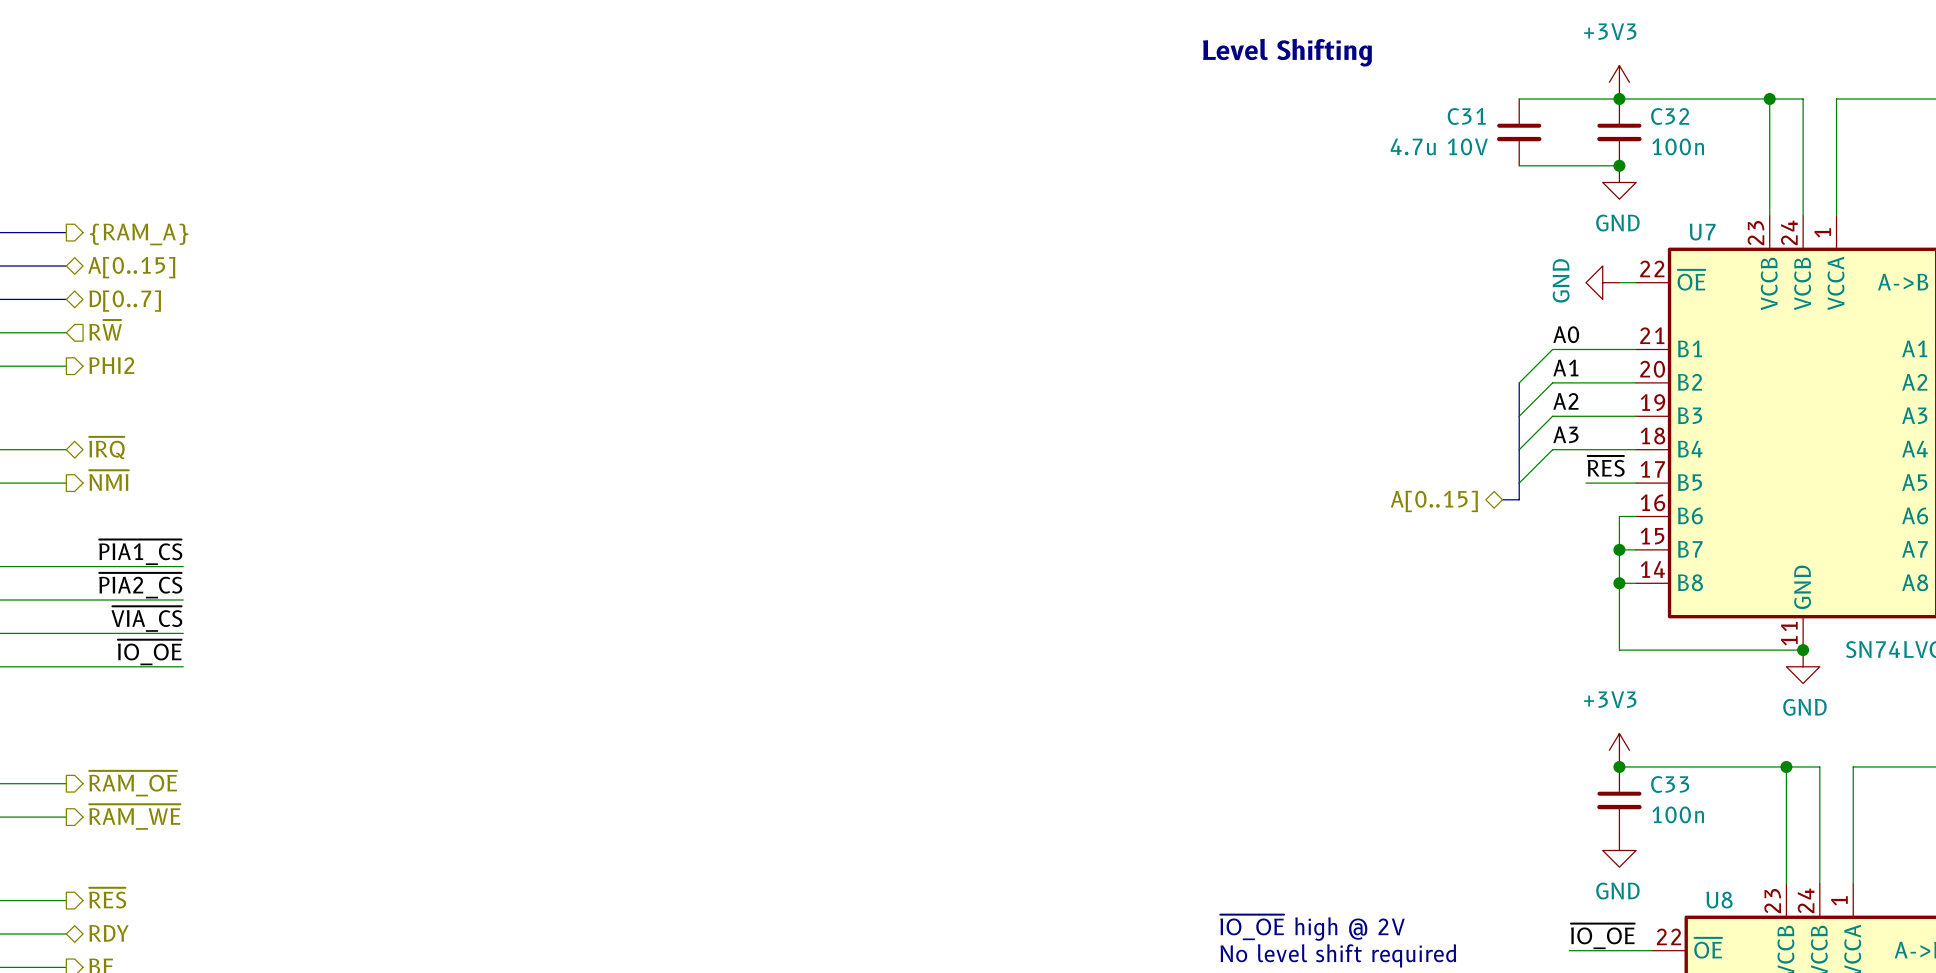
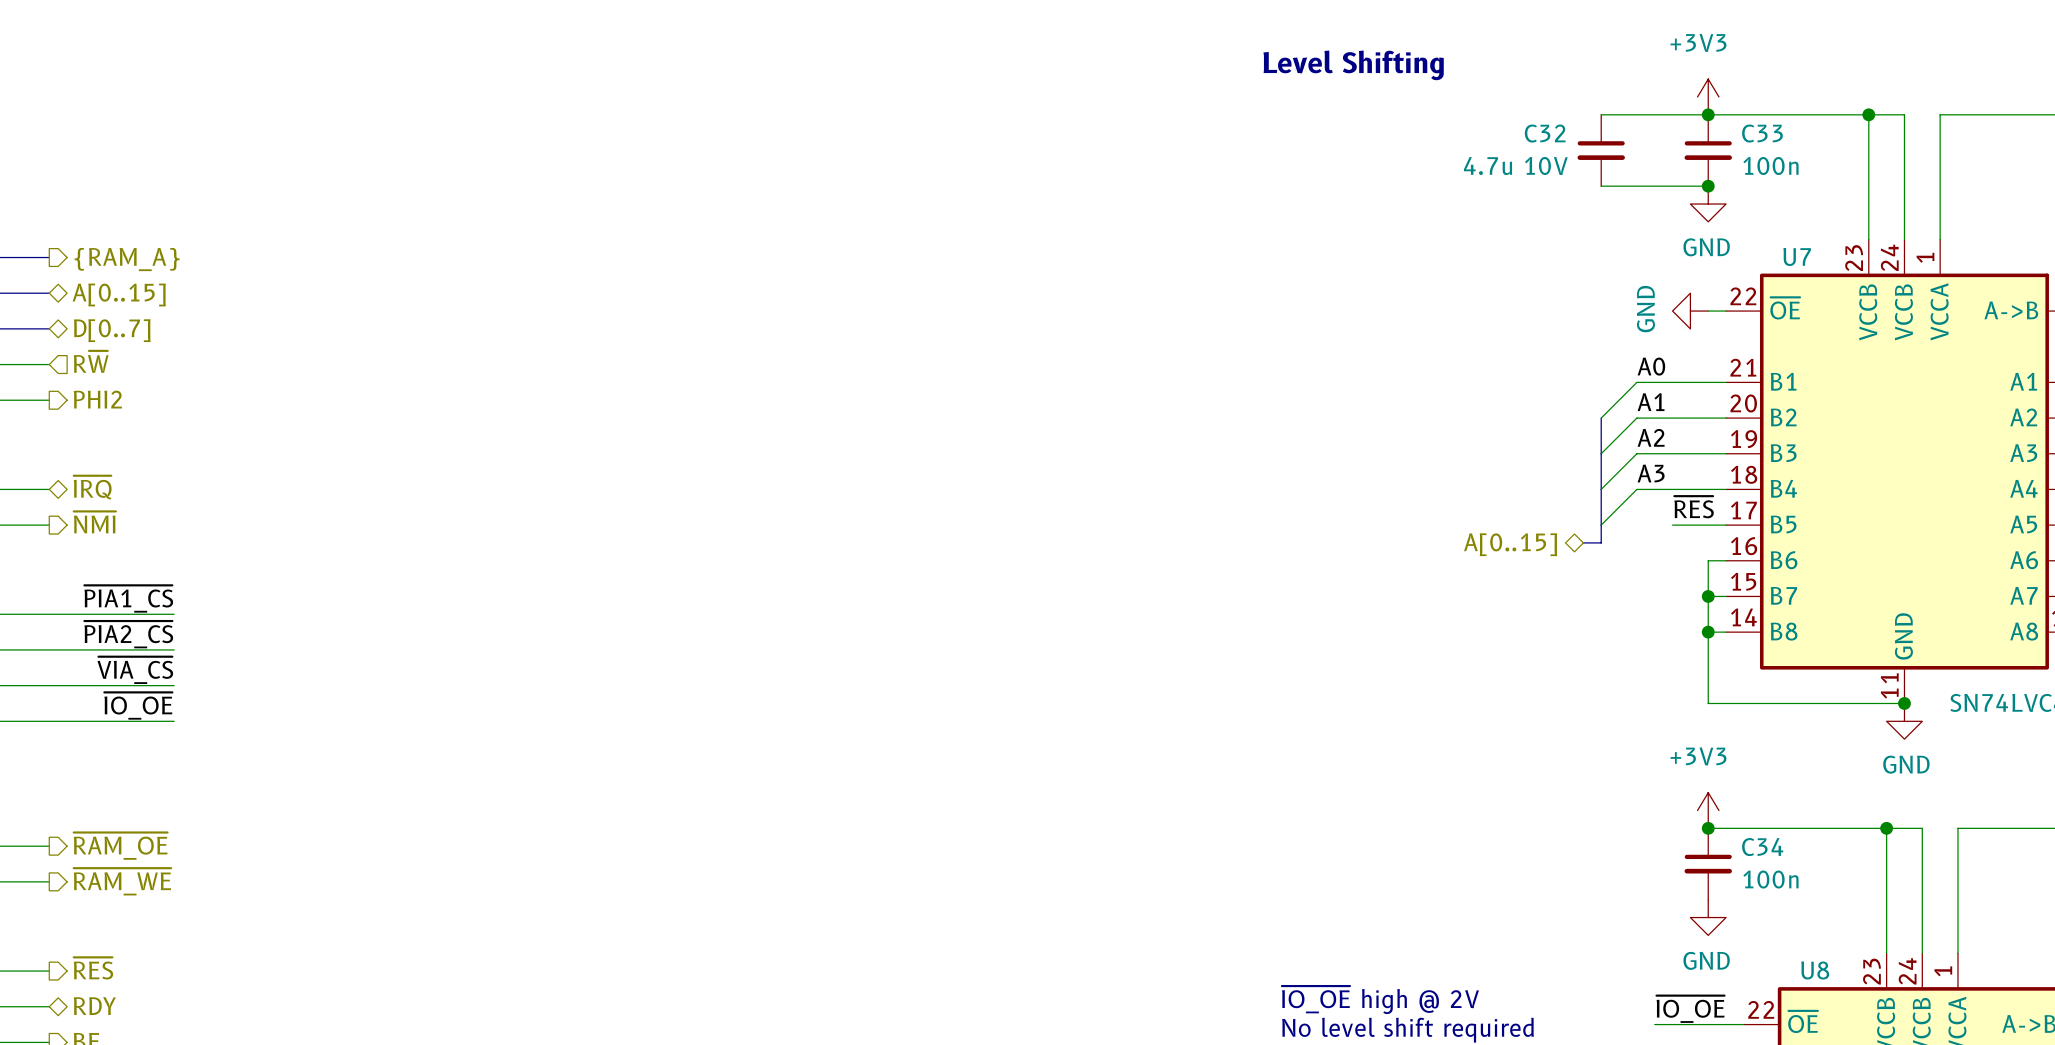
C31 name: C31 (1466, 116) -> C32 (1545, 133)
C32 name: C32 (1670, 116) -> C33 (1762, 133)
C33 name: C33 (1670, 784) -> C34 (1762, 847)

